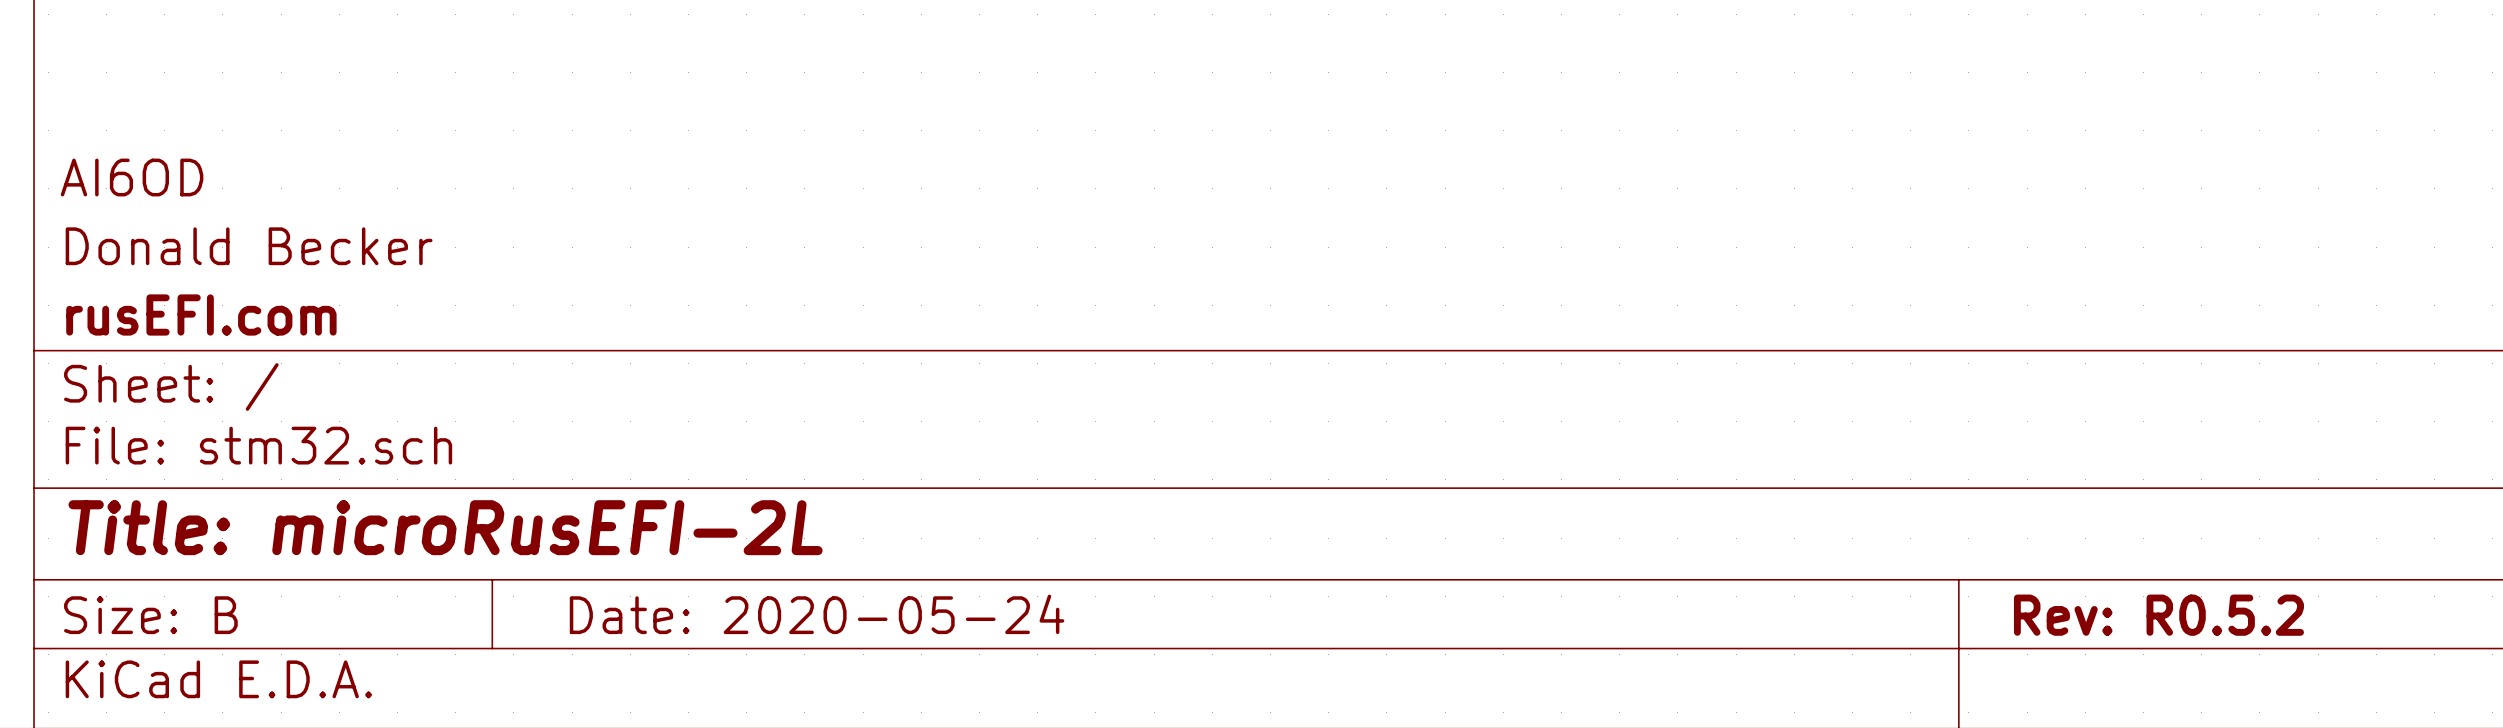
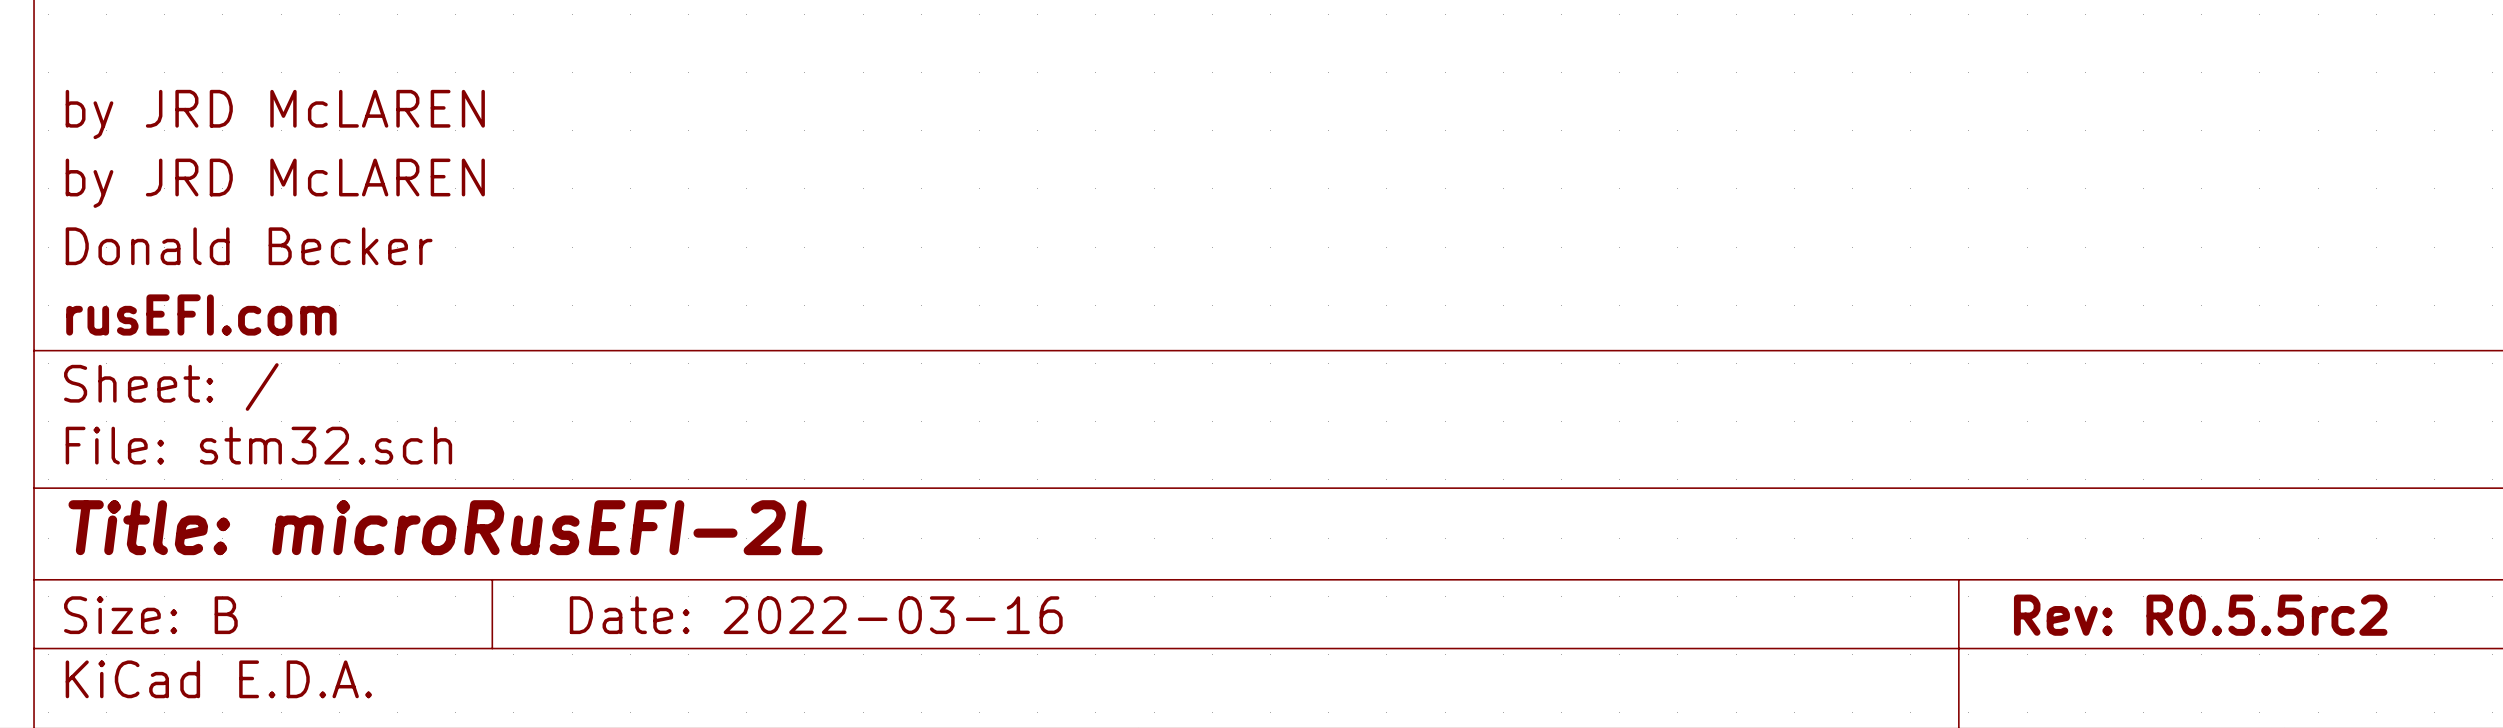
title block: none -> by JRD McLAREN (275, 114)
title block: AI6OD (132, 177) -> by JRD McLAREN (275, 183)
title block: Date: 2020-05-24 (817, 614) -> Date: 2022-03-16 (816, 615)
title block: Rev: R0.5.2 (2158, 615) -> Rev: R0.5.5rc2 (2200, 615)

